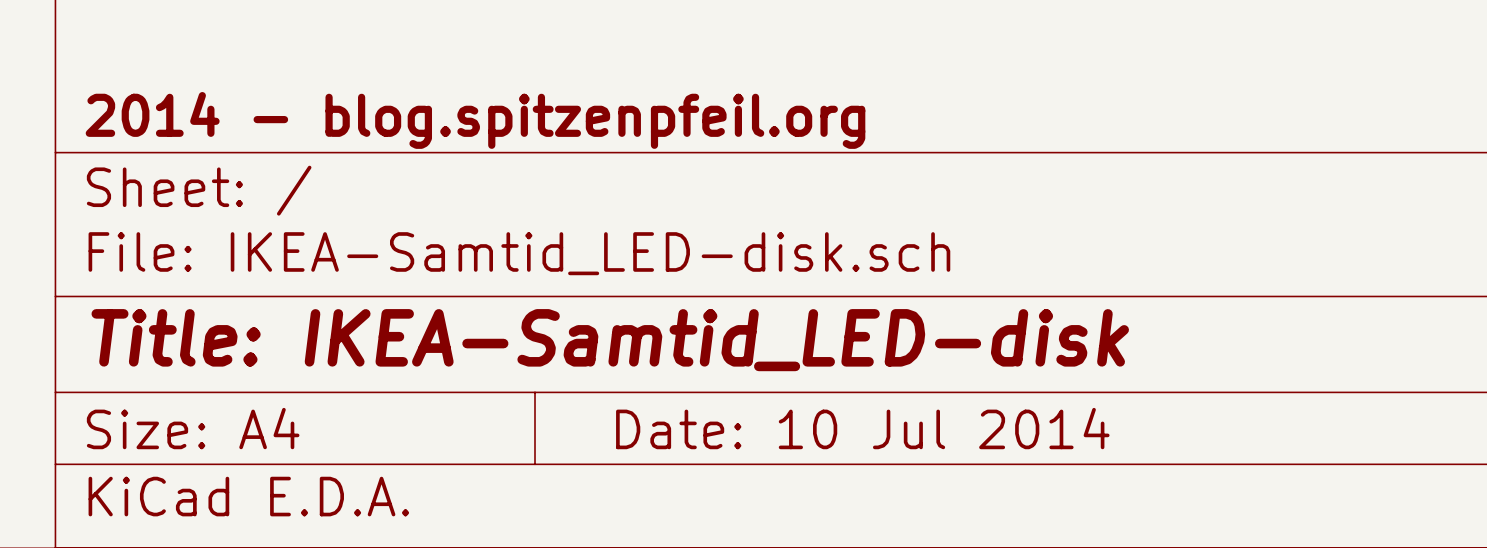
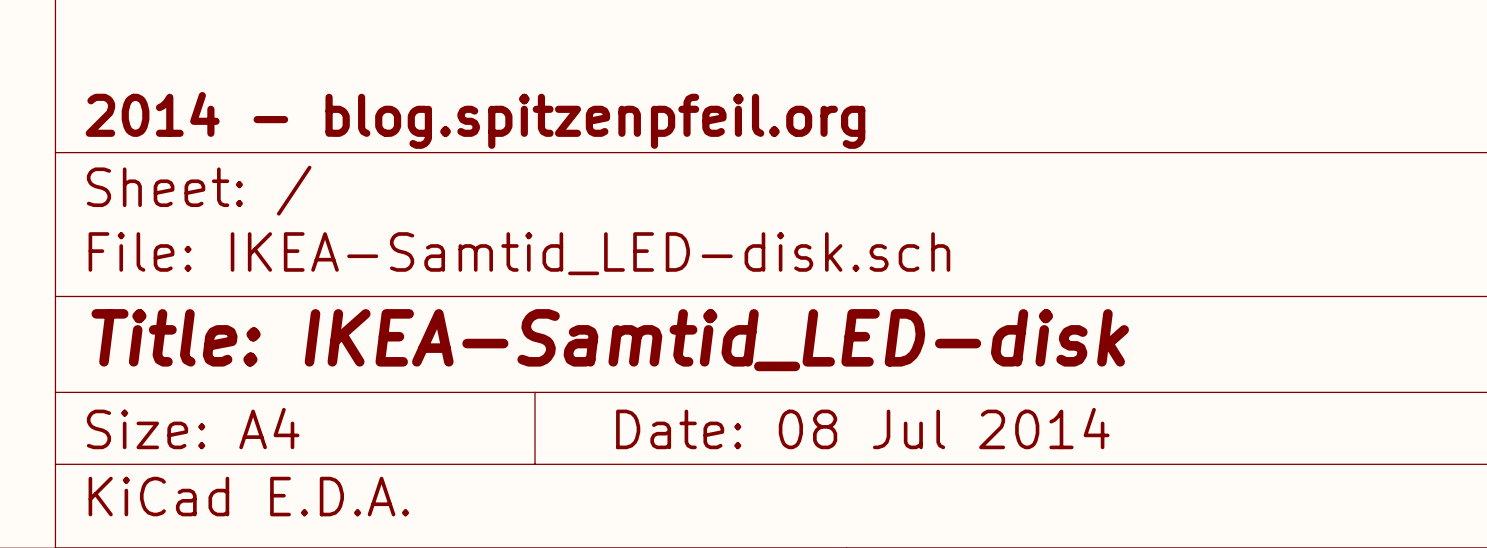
title block: Date: 10 Jul 2014 (862, 428) -> Date: 08 Jul 2014 (862, 428)

